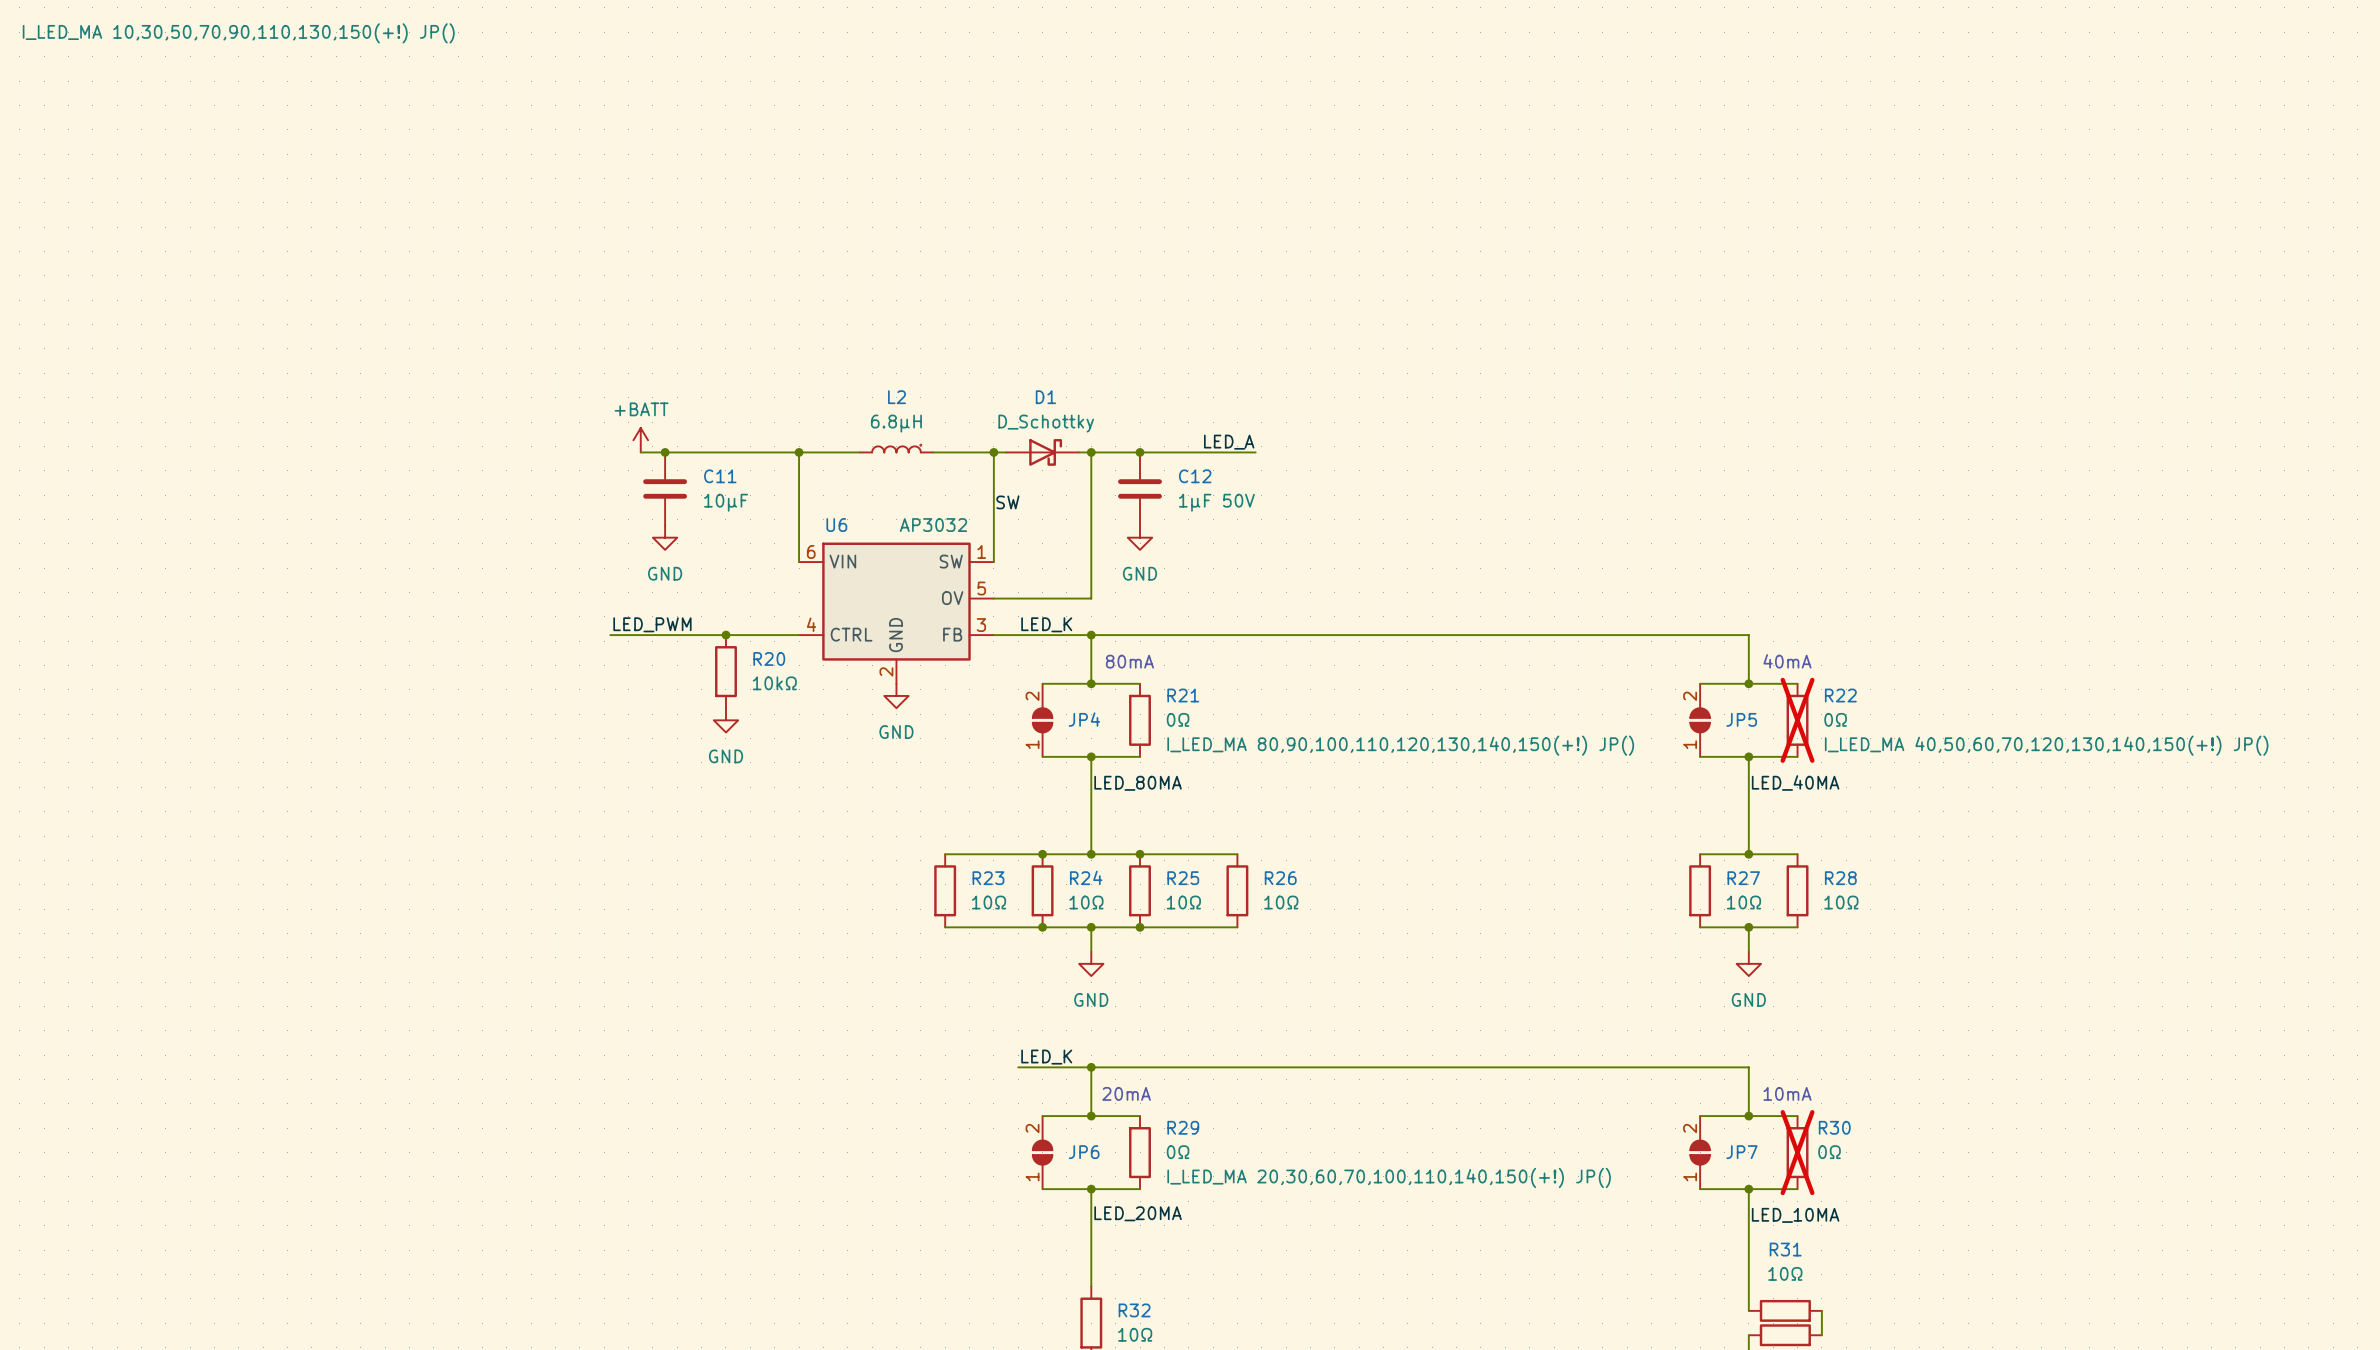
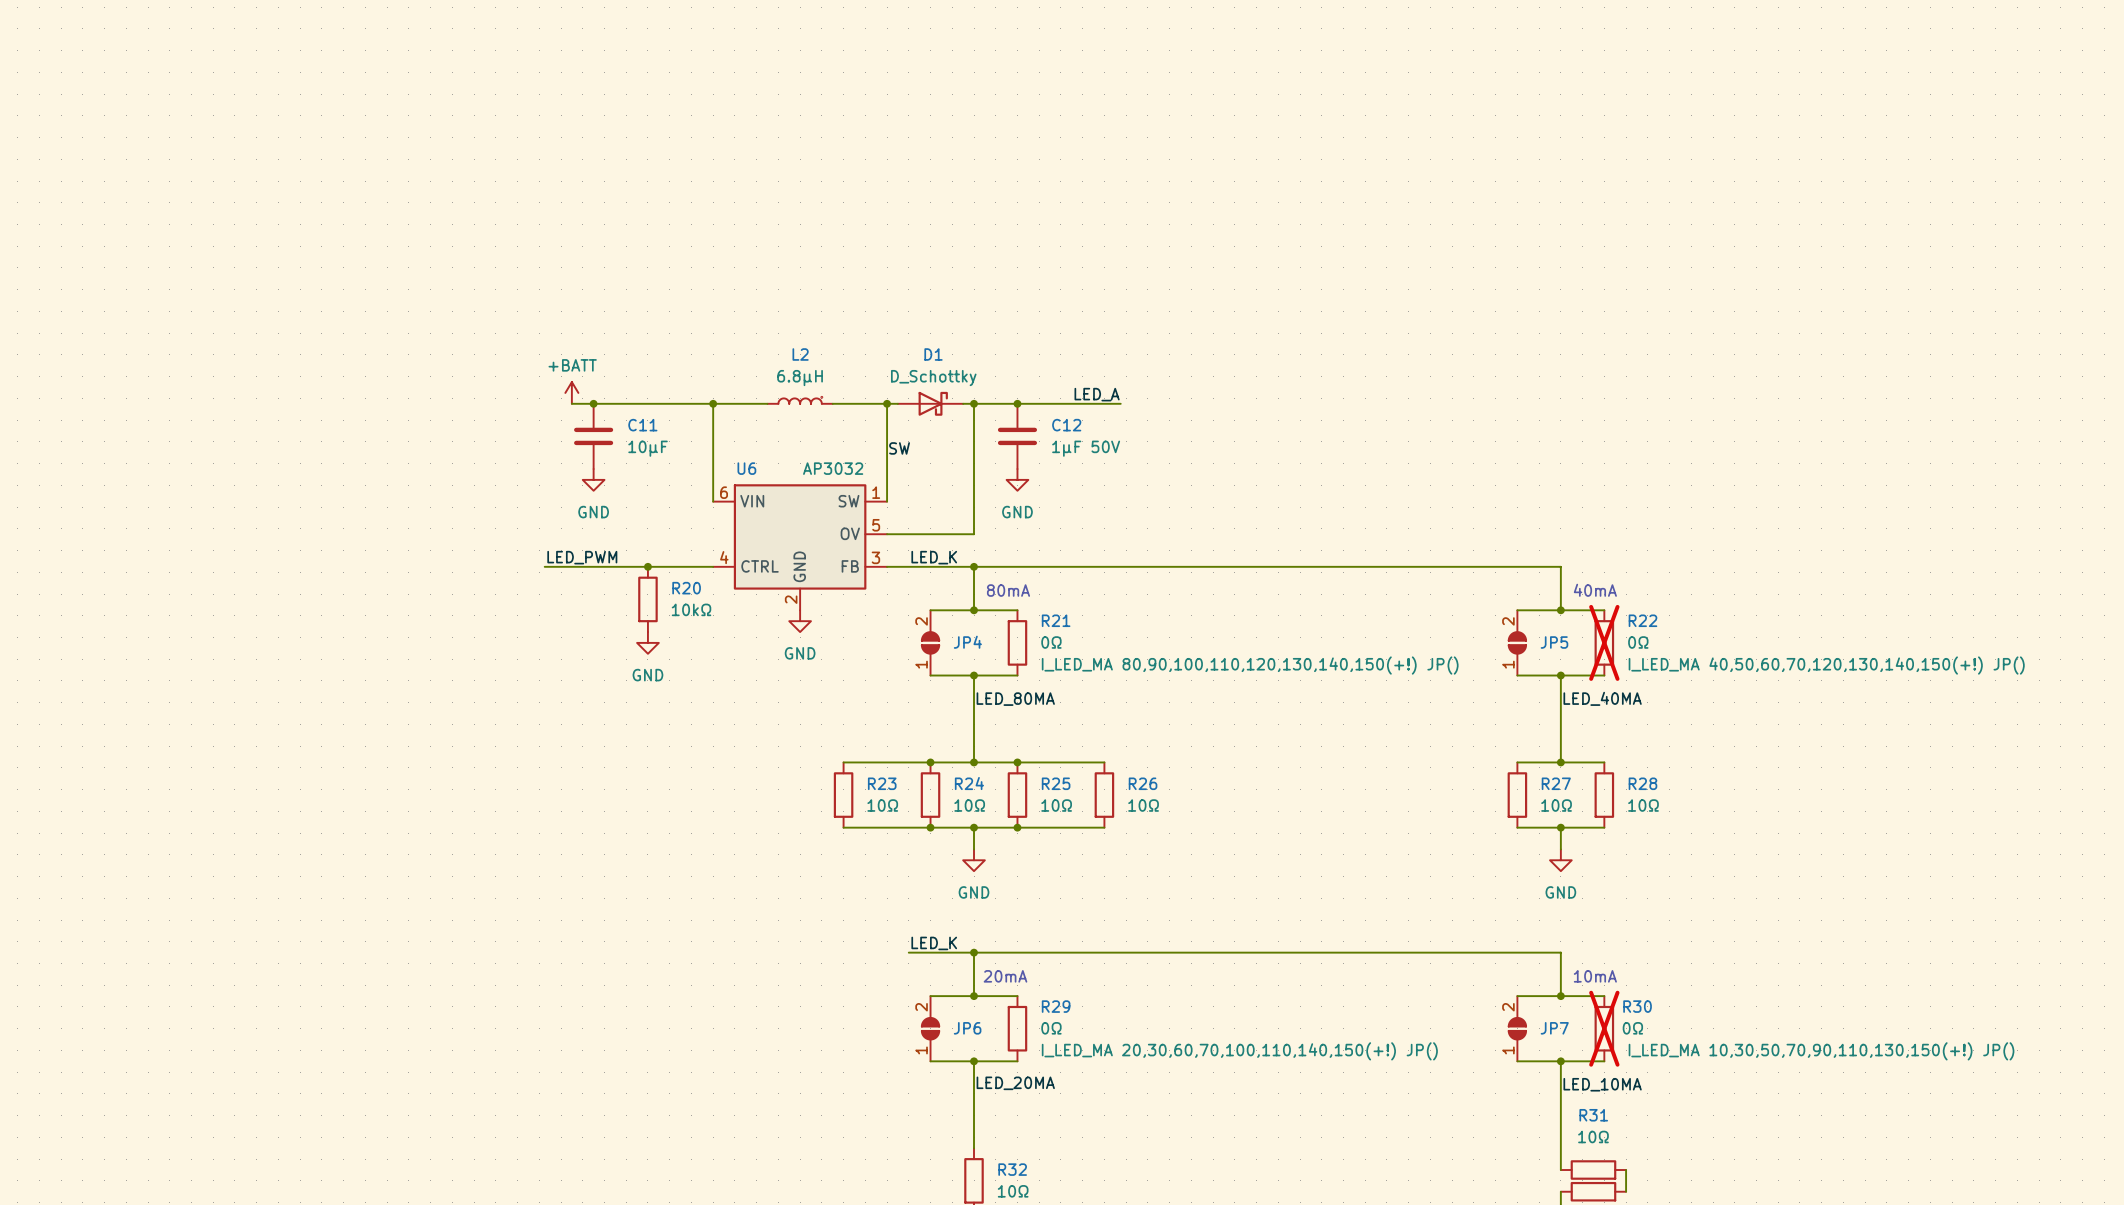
R30 text position: I_LED_MA 10,30,50,70,90,110,130,150(+!) JP() (238, 33) -> I_LED_MA 10,30,50,70,90,110,130,150(+!) JP() (1821, 1051)

